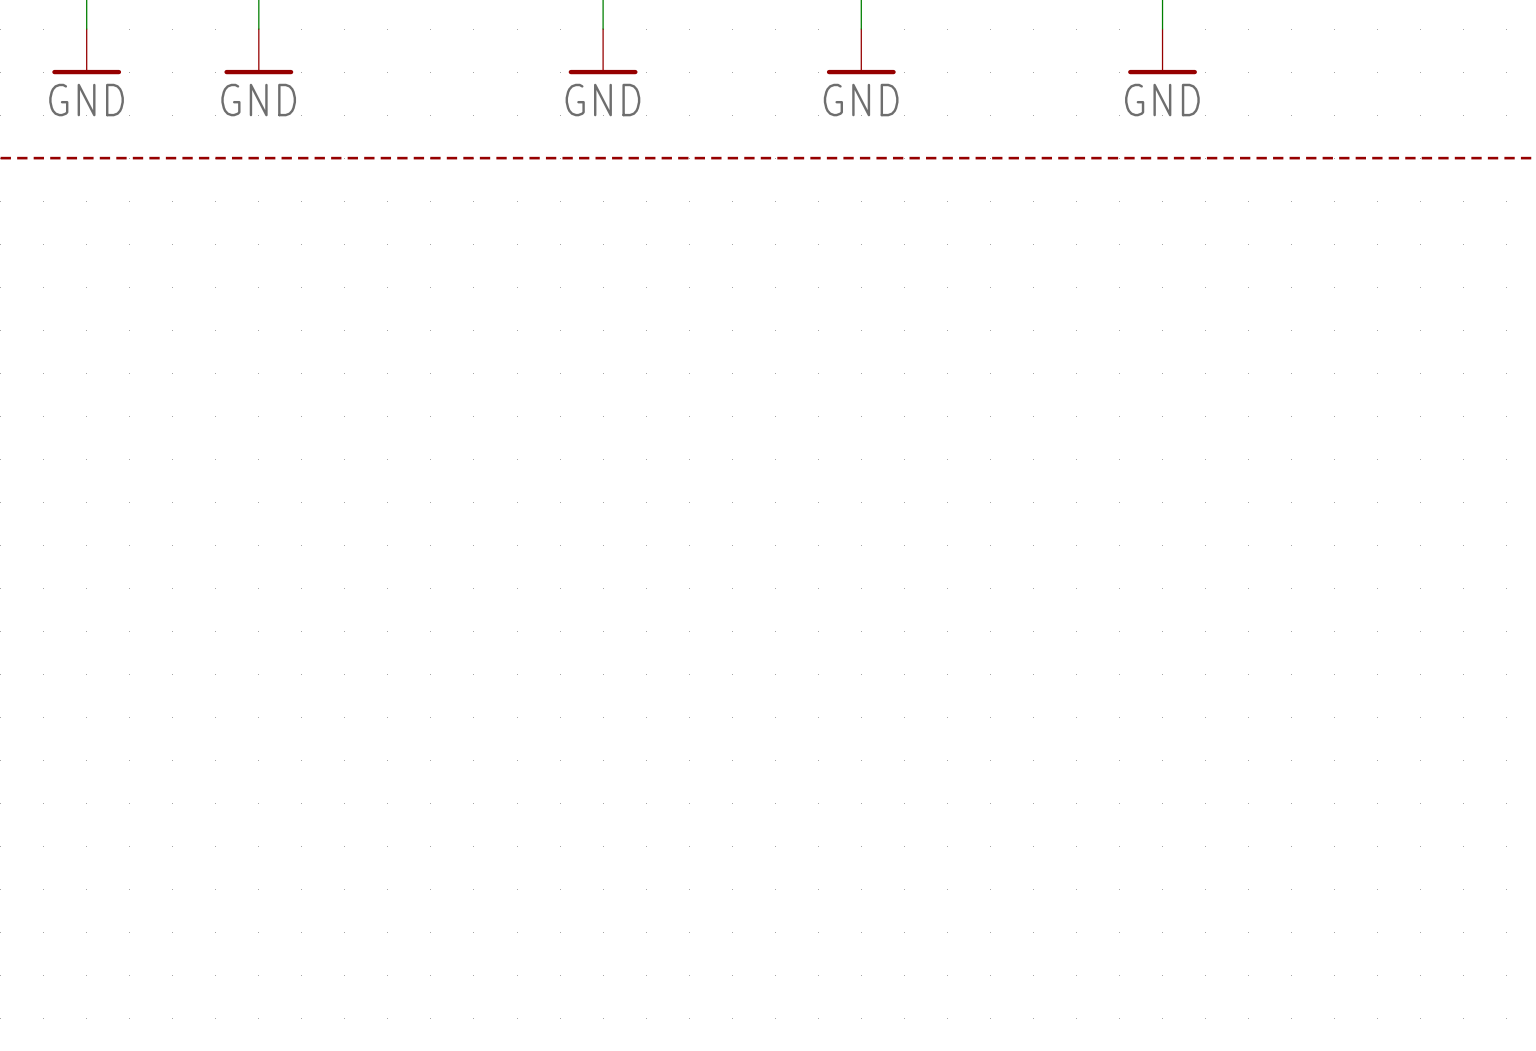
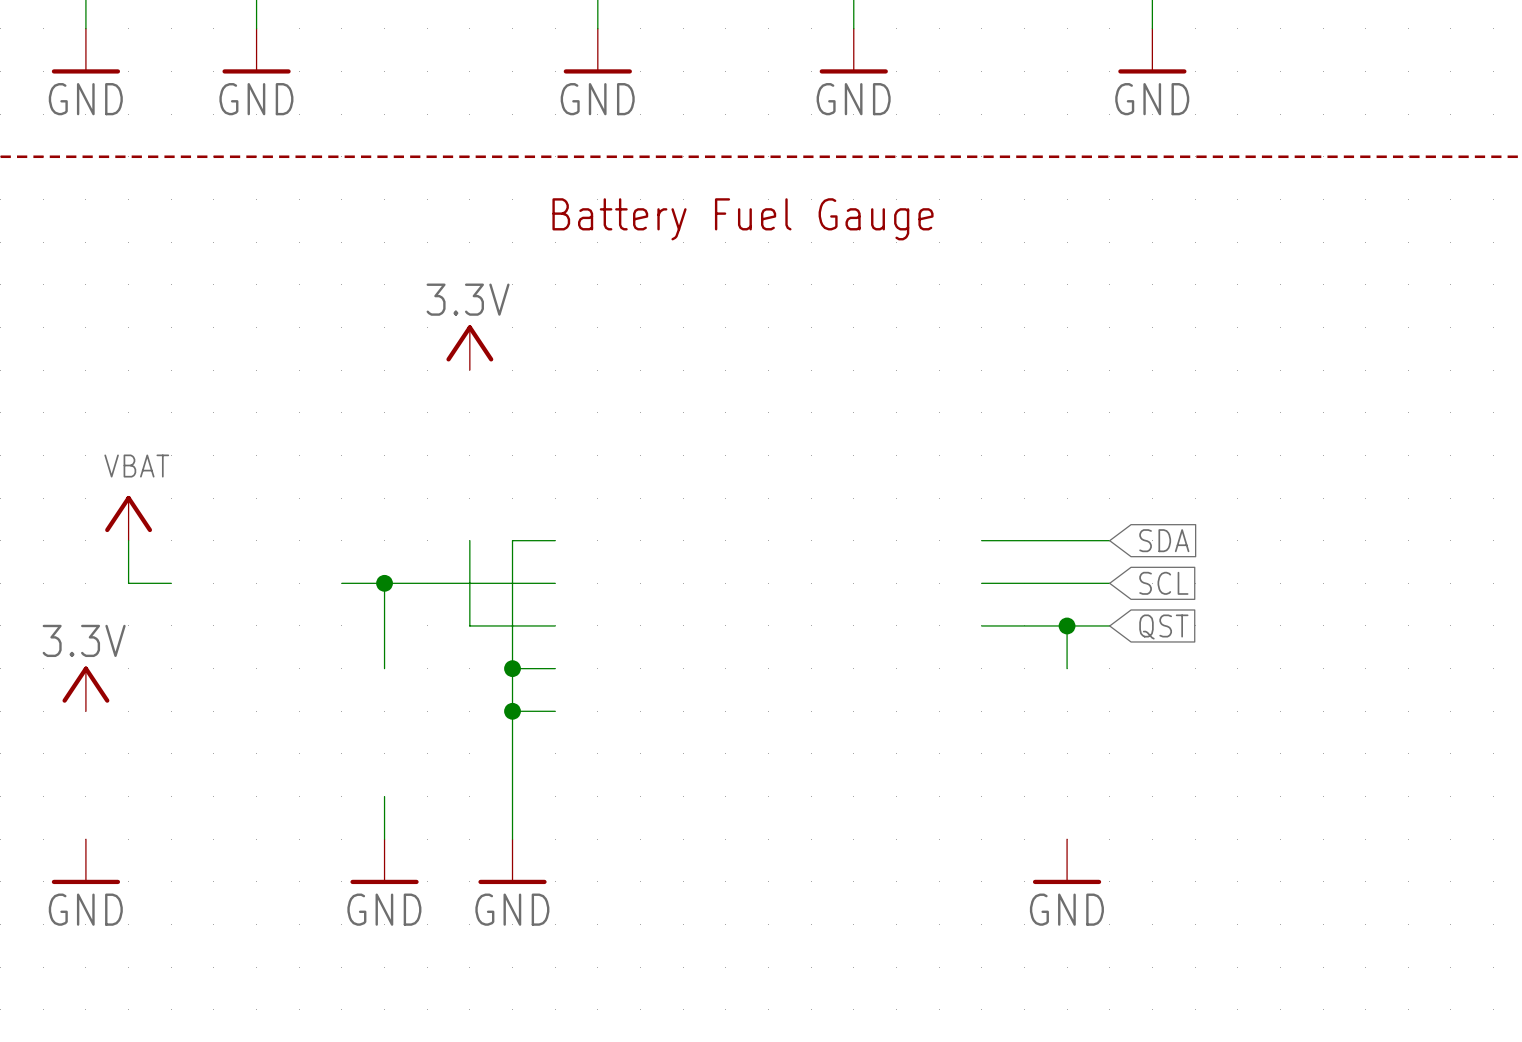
text: none -> Battery Fuel Gauge (742, 219)
power symbol: none -> 3.3V (469, 347)
power symbol: none -> VBAT (128, 518)
wire: none -> (128, 540) (128, 583) (171, 583)
wire: none -> (469, 540) (469, 625) (555, 625)
wire: none -> (555, 540) (512, 540) (512, 839)
wire: none -> (981, 540) (1109, 540)
global label: none -> SDA (1164, 540)
wire: none -> (341, 583) (555, 583)
wire: none -> (384, 583) (384, 668)
junction: none -> (384, 583)
wire: none -> (981, 583) (1109, 583)
global label: none -> SCL (1163, 583)
wire: none -> (981, 625) (1109, 625)
wire: none -> (1067, 625) (1067, 668)
junction: none -> (1067, 625)
global label: none -> QST (1163, 627)
wire: none -> (512, 668) (555, 668)
junction: none -> (512, 668)
power symbol: none -> 3.3V (85, 688)
wire: none -> (512, 711) (555, 711)
junction: none -> (512, 711)
wire: none -> (384, 796) (384, 839)
power symbol: none -> GND (85, 861)
power symbol: none -> GND (384, 861)
power symbol: none -> GND (512, 861)
power symbol: none -> GND (1067, 861)

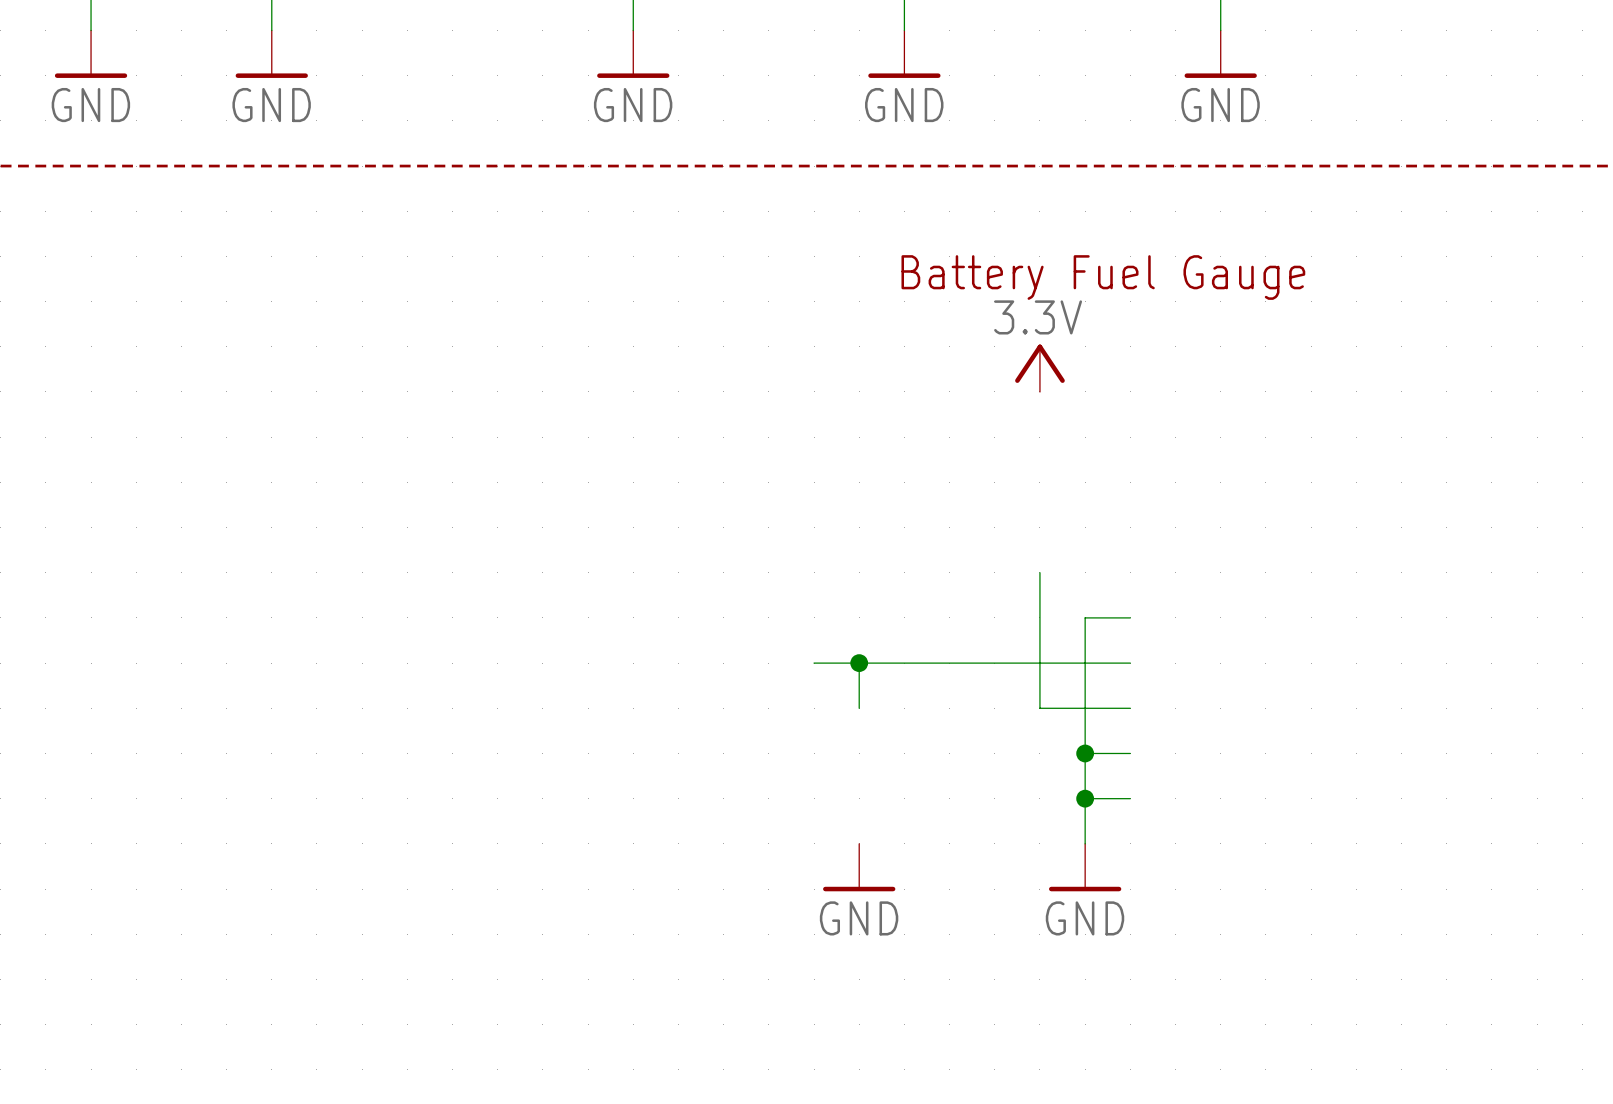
text position: Battery Fuel Gauge (742, 219) -> Battery Fuel Gauge (1103, 277)
power symbol: 3.3V (469, 347) -> none
power symbol: none -> 3.3V (1039, 368)
power symbol: VBAT (128, 518) -> none
wire: (128, 540) (128, 583) (171, 583) -> none
wire: (469, 540) (469, 625) (555, 625) -> none
wire: (555, 540) (512, 540) (512, 839) -> none
wire: (981, 540) (1109, 540) -> (1039, 572) (1039, 708) (1130, 708)
global label: SDA (1164, 540) -> none
wire: (341, 583) (555, 583) -> none
wire: (384, 583) (384, 668) -> none
junction: (384, 583) -> none
wire: (981, 583) (1024, 583) -> (1085, 843) (1085, 617)
wire: (1067, 583) (1109, 583) -> (1085, 753) (1130, 753)
global label: SCL (1163, 583) -> none
wire: none -> (814, 663) (1039, 663)
wire: none -> (859, 663) (859, 708)
junction: none -> (859, 663)
junction: (1067, 625) -> none
wire: (1109, 625) (1067, 625) (1067, 668) -> none
global label: QST (1163, 627) -> none
wire: (512, 668) (555, 668) -> none
junction: (512, 668) -> none
power symbol: 3.3V (85, 688) -> none
wire: (512, 711) (555, 711) -> none
junction: (512, 711) -> none
junction: none -> (1085, 753)
wire: none -> (1085, 798) (1130, 798)
junction: none -> (1085, 798)
wire: (384, 796) (384, 839) -> none
power symbol: none -> GND (859, 867)
power symbol: GND (85, 861) -> none
power symbol: GND (384, 861) -> none
power symbol: GND (512, 861) -> none
power symbol position: GND (1067, 861) -> GND (1085, 867)

